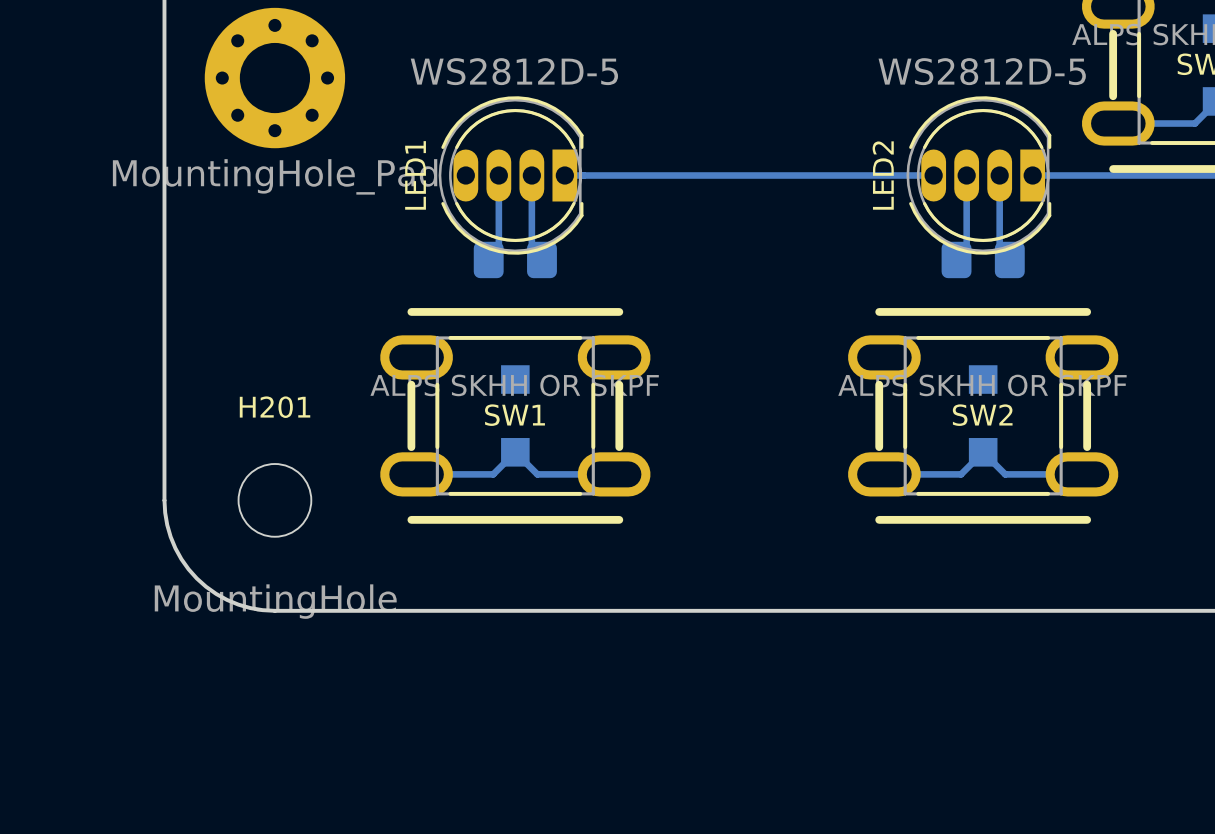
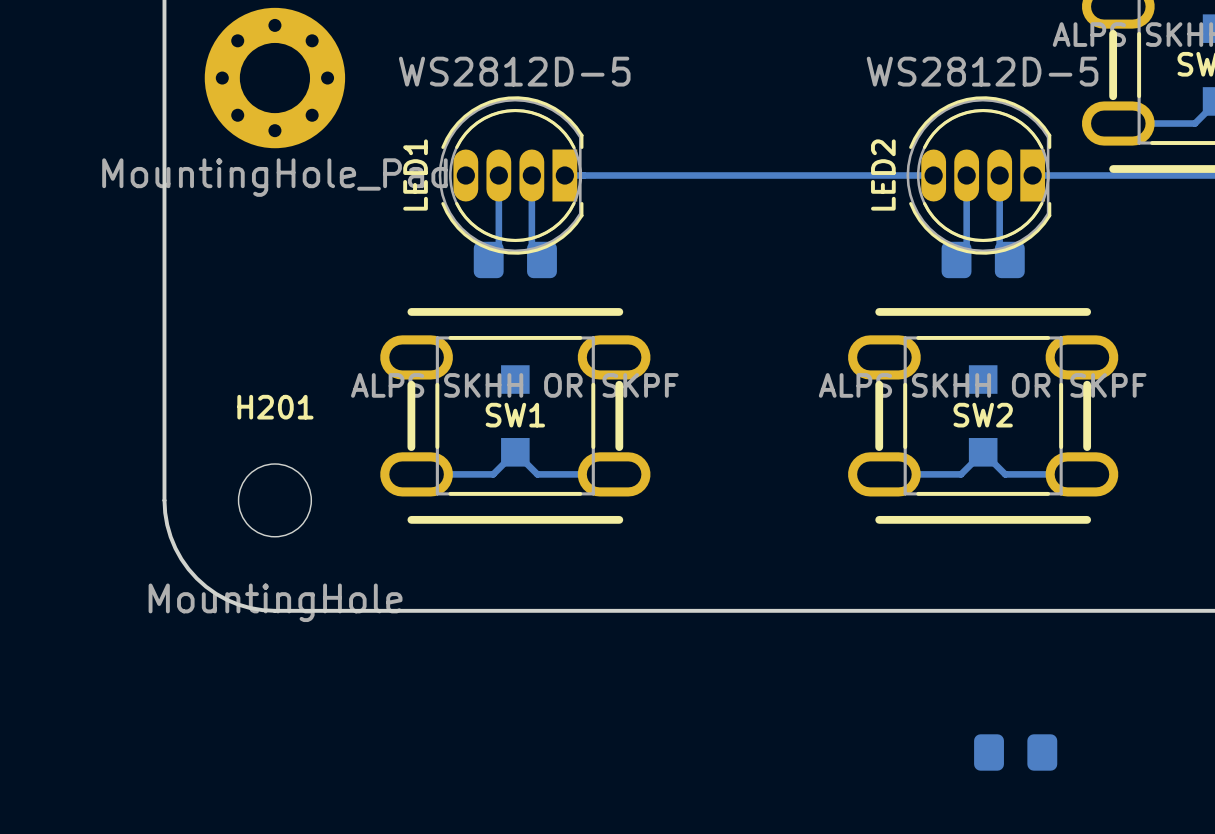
part: none -> (1015, 752)

